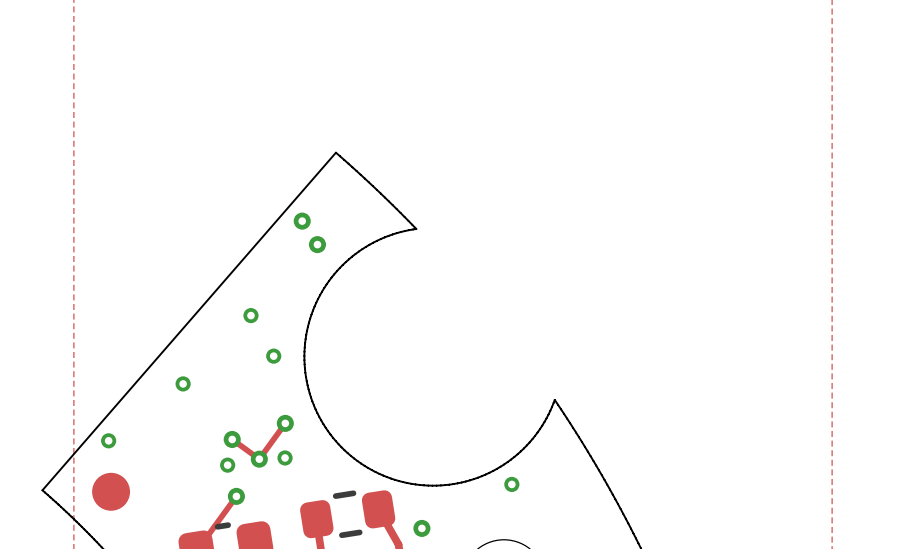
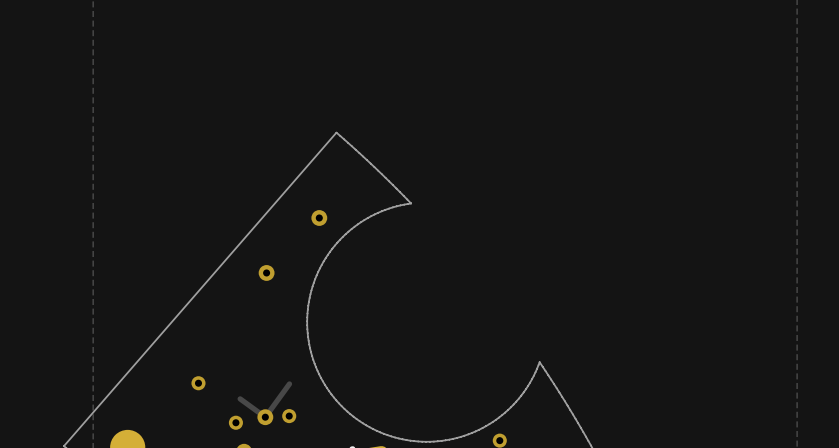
via: (302, 221) -> none
via position: (250, 315) -> (266, 272)
via: (273, 356) -> none
via position: (183, 383) -> (198, 383)
via: (285, 423) -> none
via: (232, 439) -> none
via: (108, 440) -> none

